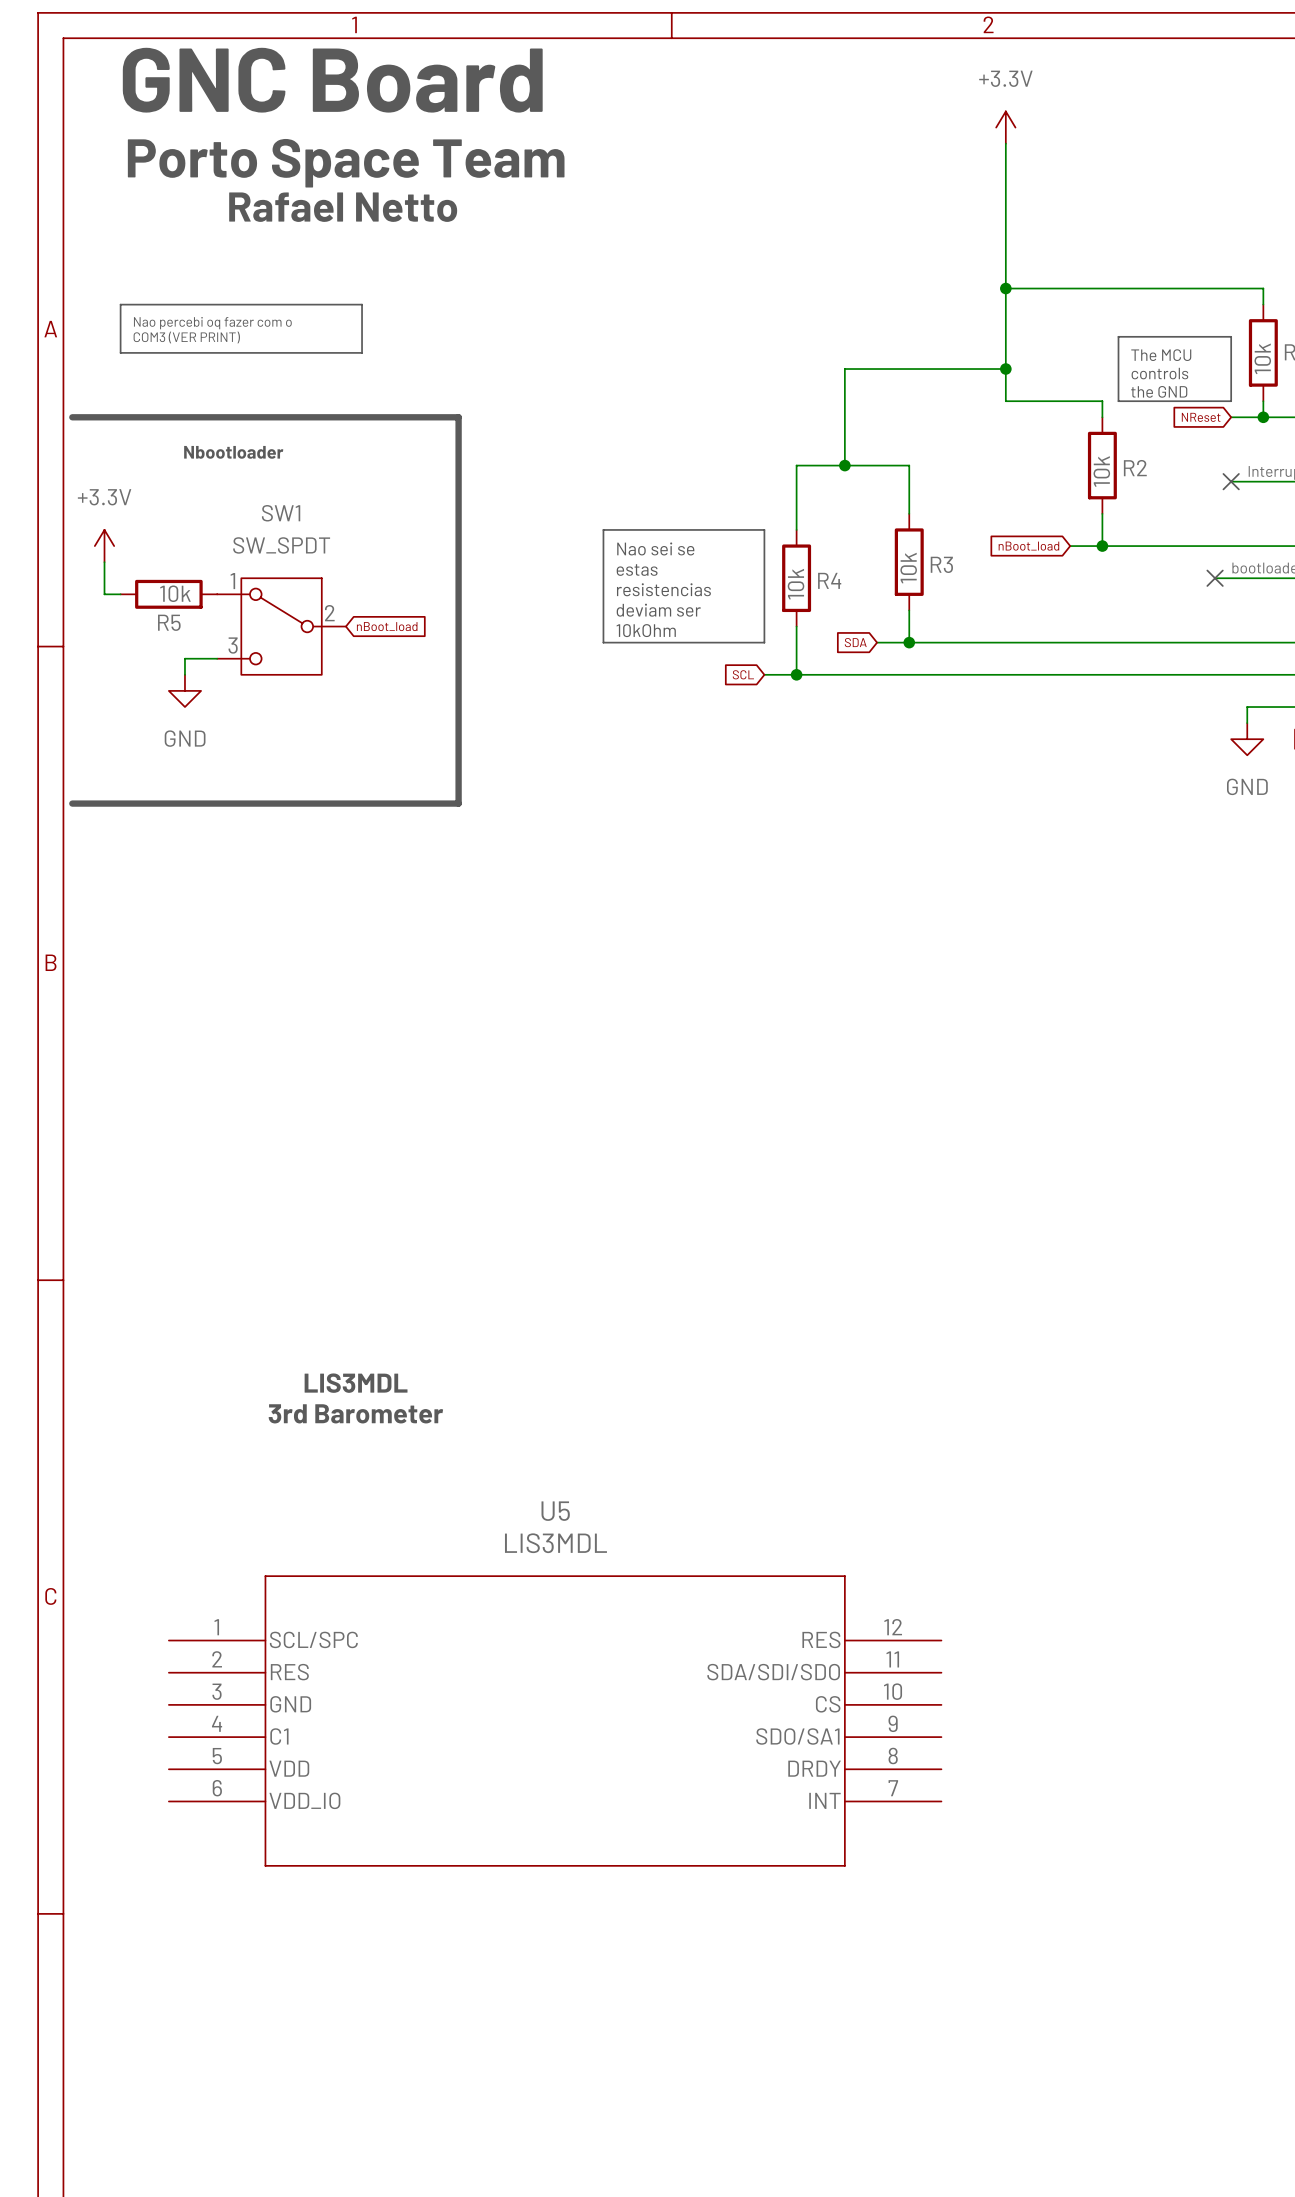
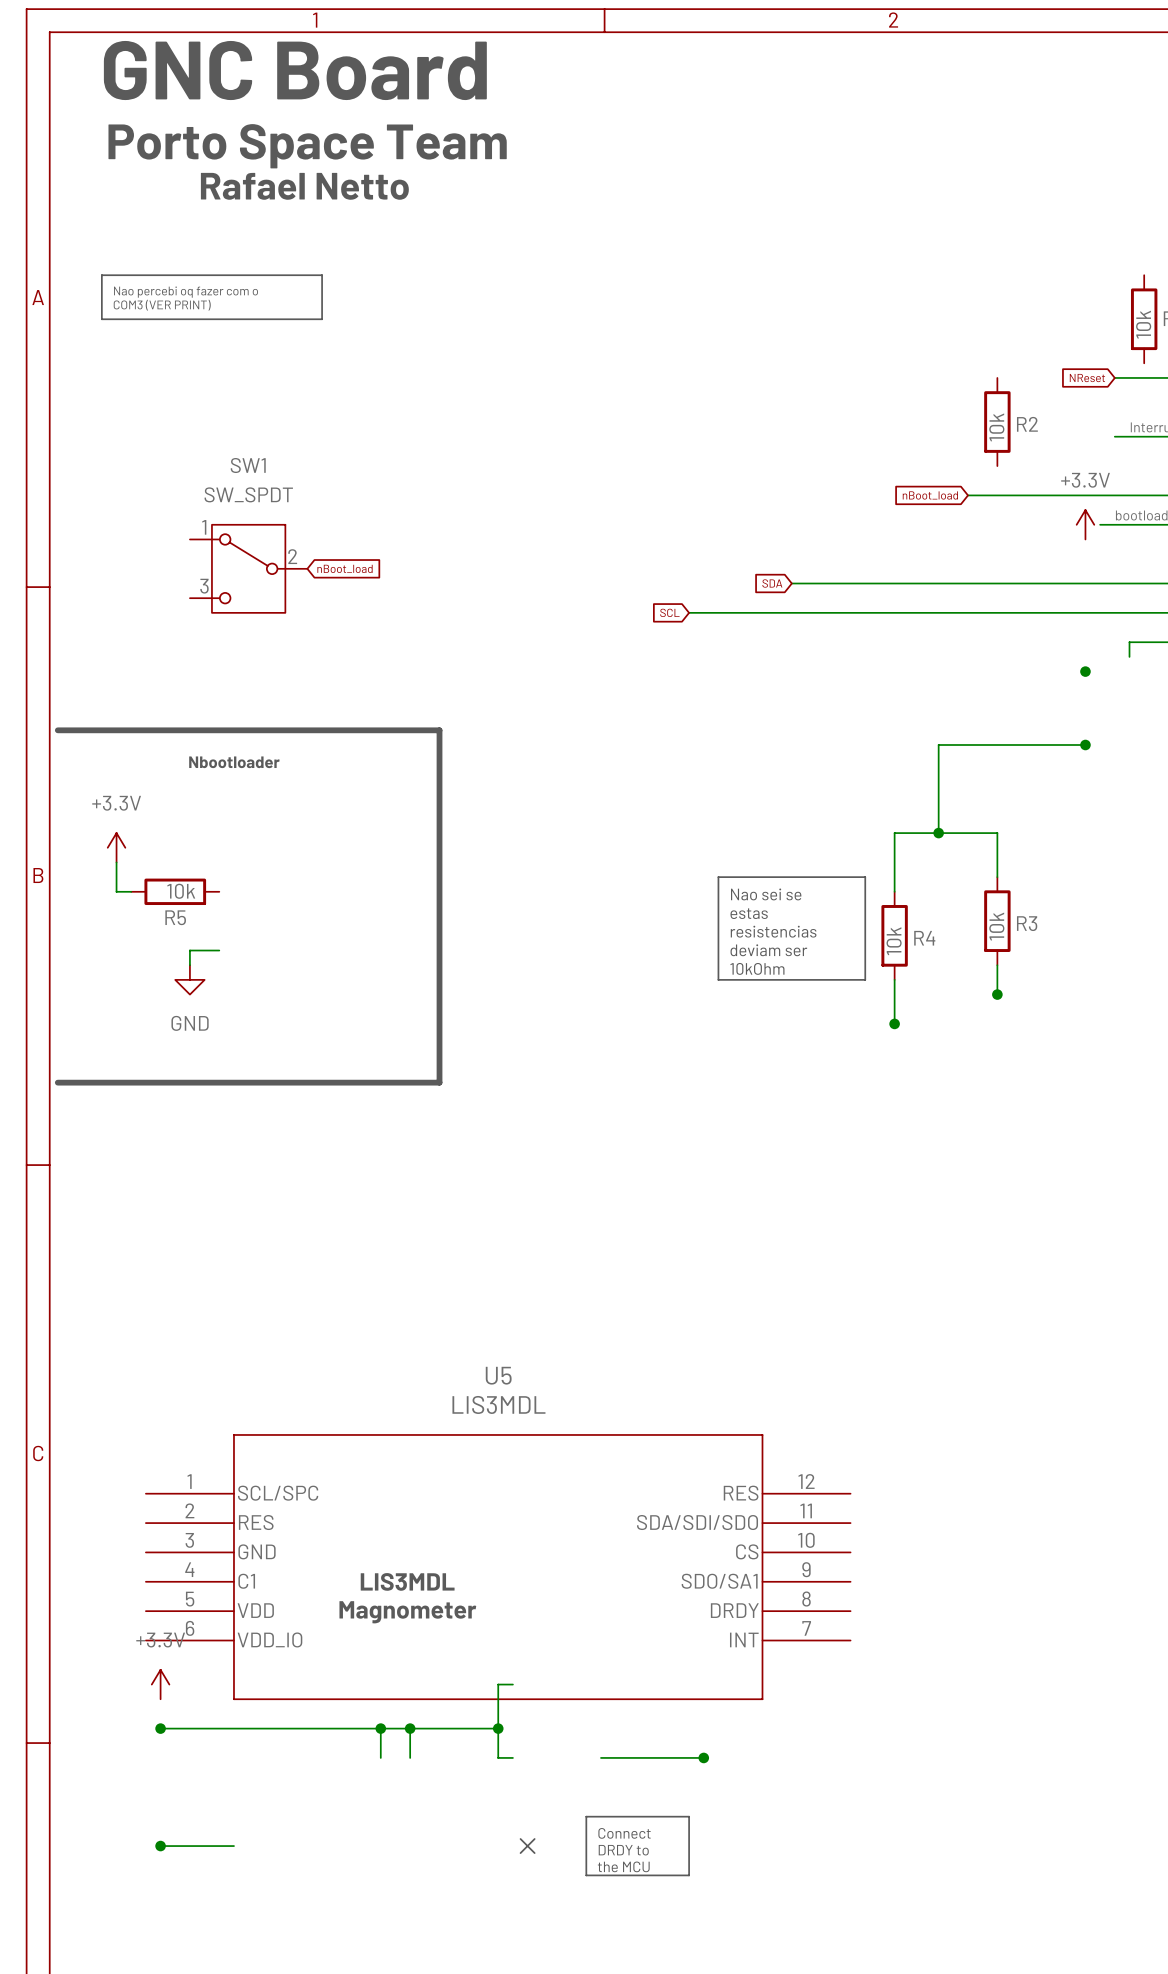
power symbol: +3.3V (1005, 127) -> none
wire: (1005, 143) (1005, 401) (1102, 401) (1102, 417) -> none
wire: (1005, 288) (1263, 288) (1263, 304) -> none
junction: (1005, 288) -> none
line: (1118, 336) (1231, 336) (1231, 401) (1118, 401) (1118, 336) -> none
text: The MCU (1161, 355) -> none
wire: (1005, 369) (844, 369) (844, 465) -> none
junction: (1005, 369) -> none
text: controls (1159, 373) -> none
text: the GND (1159, 391) -> none
wire: (1263, 401) (1263, 417) -> none
line: (72, 417) (458, 417) (458, 803) -> (57, 1082) (439, 1082) (439, 730) (410, 730)
junction: (1263, 417) -> none
text: Nbootloader (233, 452) -> none
junction: (844, 465) -> none
no-connect mark: (1231, 481) -> none
wire: (909, 513) (909, 465) (796, 465) (796, 529) -> none
wire: (1102, 513) (1102, 546) -> none
line: (603, 529) (764, 529) (764, 642) (603, 642) (603, 529) -> none
power symbol: +3.3V (104, 546) -> none
junction: (1102, 546) -> none
text: Nao sei se (655, 548) -> none
wire: (104, 562) (104, 594) (120, 594) -> none
R3 position: (909, 562) -> (997, 921)
text: estas (637, 570) -> none
R4 position: (796, 578) -> (894, 935)
power symbol: none -> +3.3V (1085, 524)
no-connect mark: (1215, 578) -> none
text: resistencias (663, 589) -> none
R5 position: (168, 594) -> (175, 891)
text: deviam ser (658, 610) -> none
wire: (909, 610) (909, 642) -> none
wire: (796, 626) (796, 674) -> none
text: 10kOhm (646, 630) -> none
junction: (909, 642) -> none
wire: (217, 658) (184, 658) (184, 674) -> none
junction: (796, 674) -> none
power symbol: GND (184, 690) -> none
junction: none -> (1085, 671)
power symbol: GND (1247, 739) -> none
wire: none -> (1085, 744) (938, 744) (938, 833)
junction: none -> (1085, 744)
text: none -> Nbootloader (234, 762)
junction: none -> (938, 833)
power symbol: none -> +3.3V (116, 847)
wire: none -> (116, 862) (116, 891) (131, 891)
line: none -> (718, 877) (865, 877) (865, 979) (718, 979) (718, 877)
wire: none -> (997, 877) (997, 833) (894, 833) (894, 891)
text: none -> Nao sei se (766, 894)
text: none -> estas (749, 913)
text: none -> resistencias (773, 931)
text: none -> deviam ser (768, 950)
wire: none -> (219, 950) (189, 950) (189, 965)
wire: none -> (997, 965) (997, 994)
text: none -> 10kOhm (757, 968)
power symbol: none -> GND (189, 979)
wire: none -> (894, 979) (894, 1023)
junction: none -> (997, 994)
junction: none -> (894, 1023)
text: LIS3MDL (356, 1383) -> none
text: 3rd Barometer (355, 1413) -> none
text: none -> LIS3MDL (407, 1581)
text: none -> Magnometer (407, 1612)
power symbol: none -> +3.3V (160, 1684)
wire: none -> (512, 1684) (498, 1684) (498, 1757) (512, 1757)
wire: none -> (160, 1728) (498, 1728)
junction: none -> (160, 1728)
wire: none -> (380, 1728) (380, 1757)
junction: none -> (380, 1728)
wire: none -> (410, 1728) (410, 1757)
junction: none -> (410, 1728)
junction: none -> (498, 1728)
wire: none -> (601, 1757) (703, 1757)
junction: none -> (703, 1757)
line: none -> (586, 1816) (689, 1816) (689, 1875) (586, 1875) (586, 1816)
text: none -> Connect (624, 1833)
wire: none -> (160, 1846) (233, 1846)
junction: none -> (160, 1846)
no-connect mark: none -> (527, 1846)
text: none -> DRDY to (623, 1850)
text: none -> the MCU (623, 1866)

